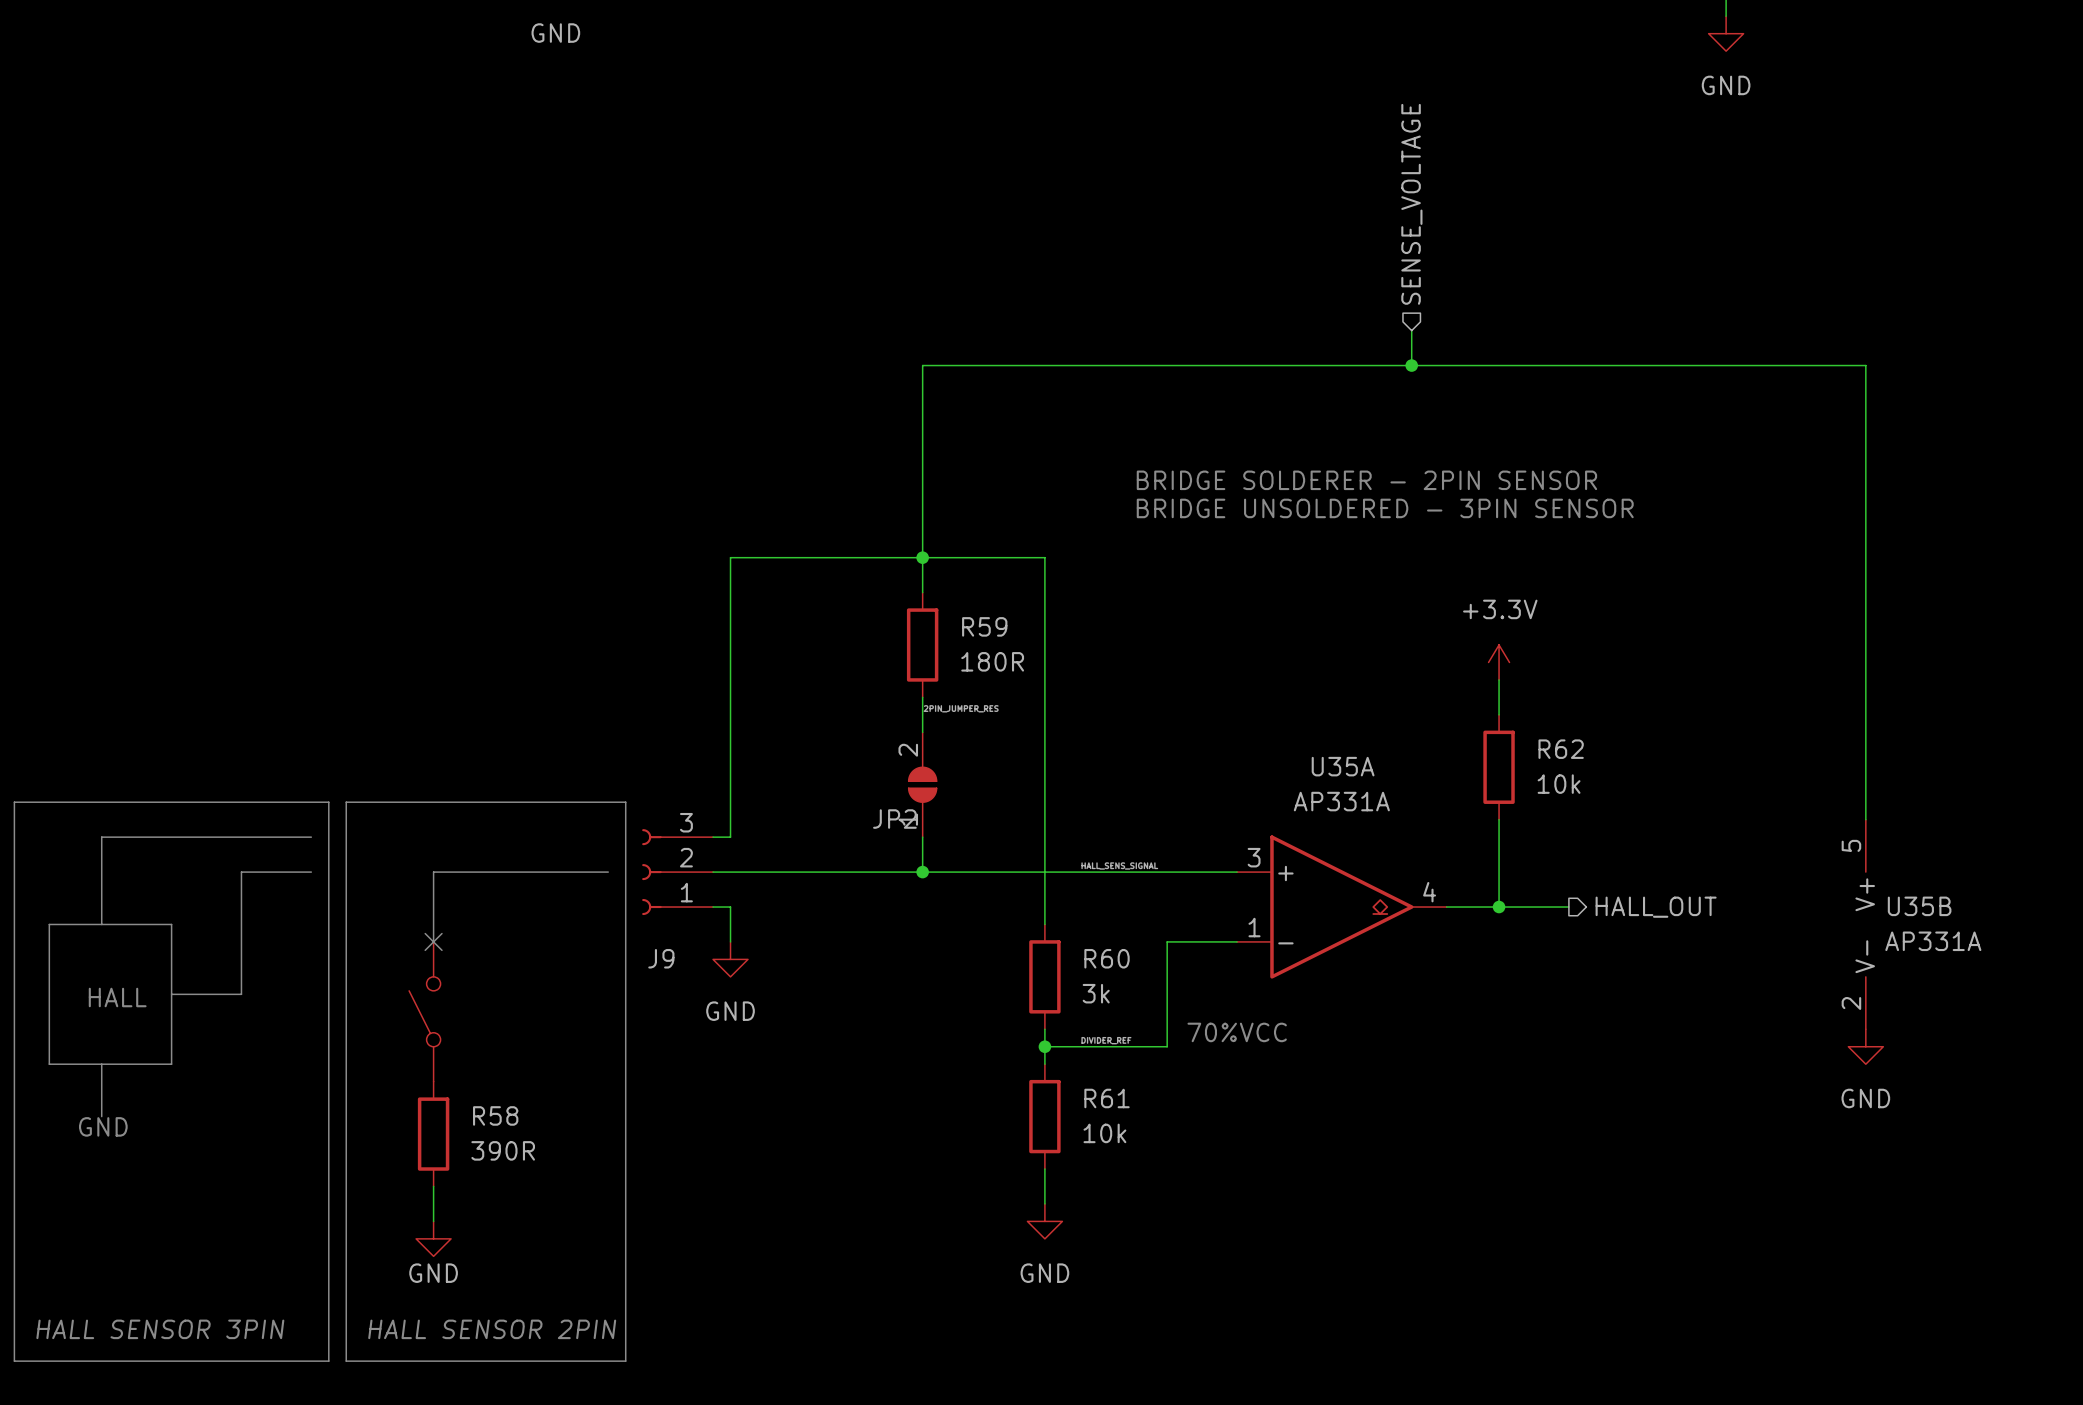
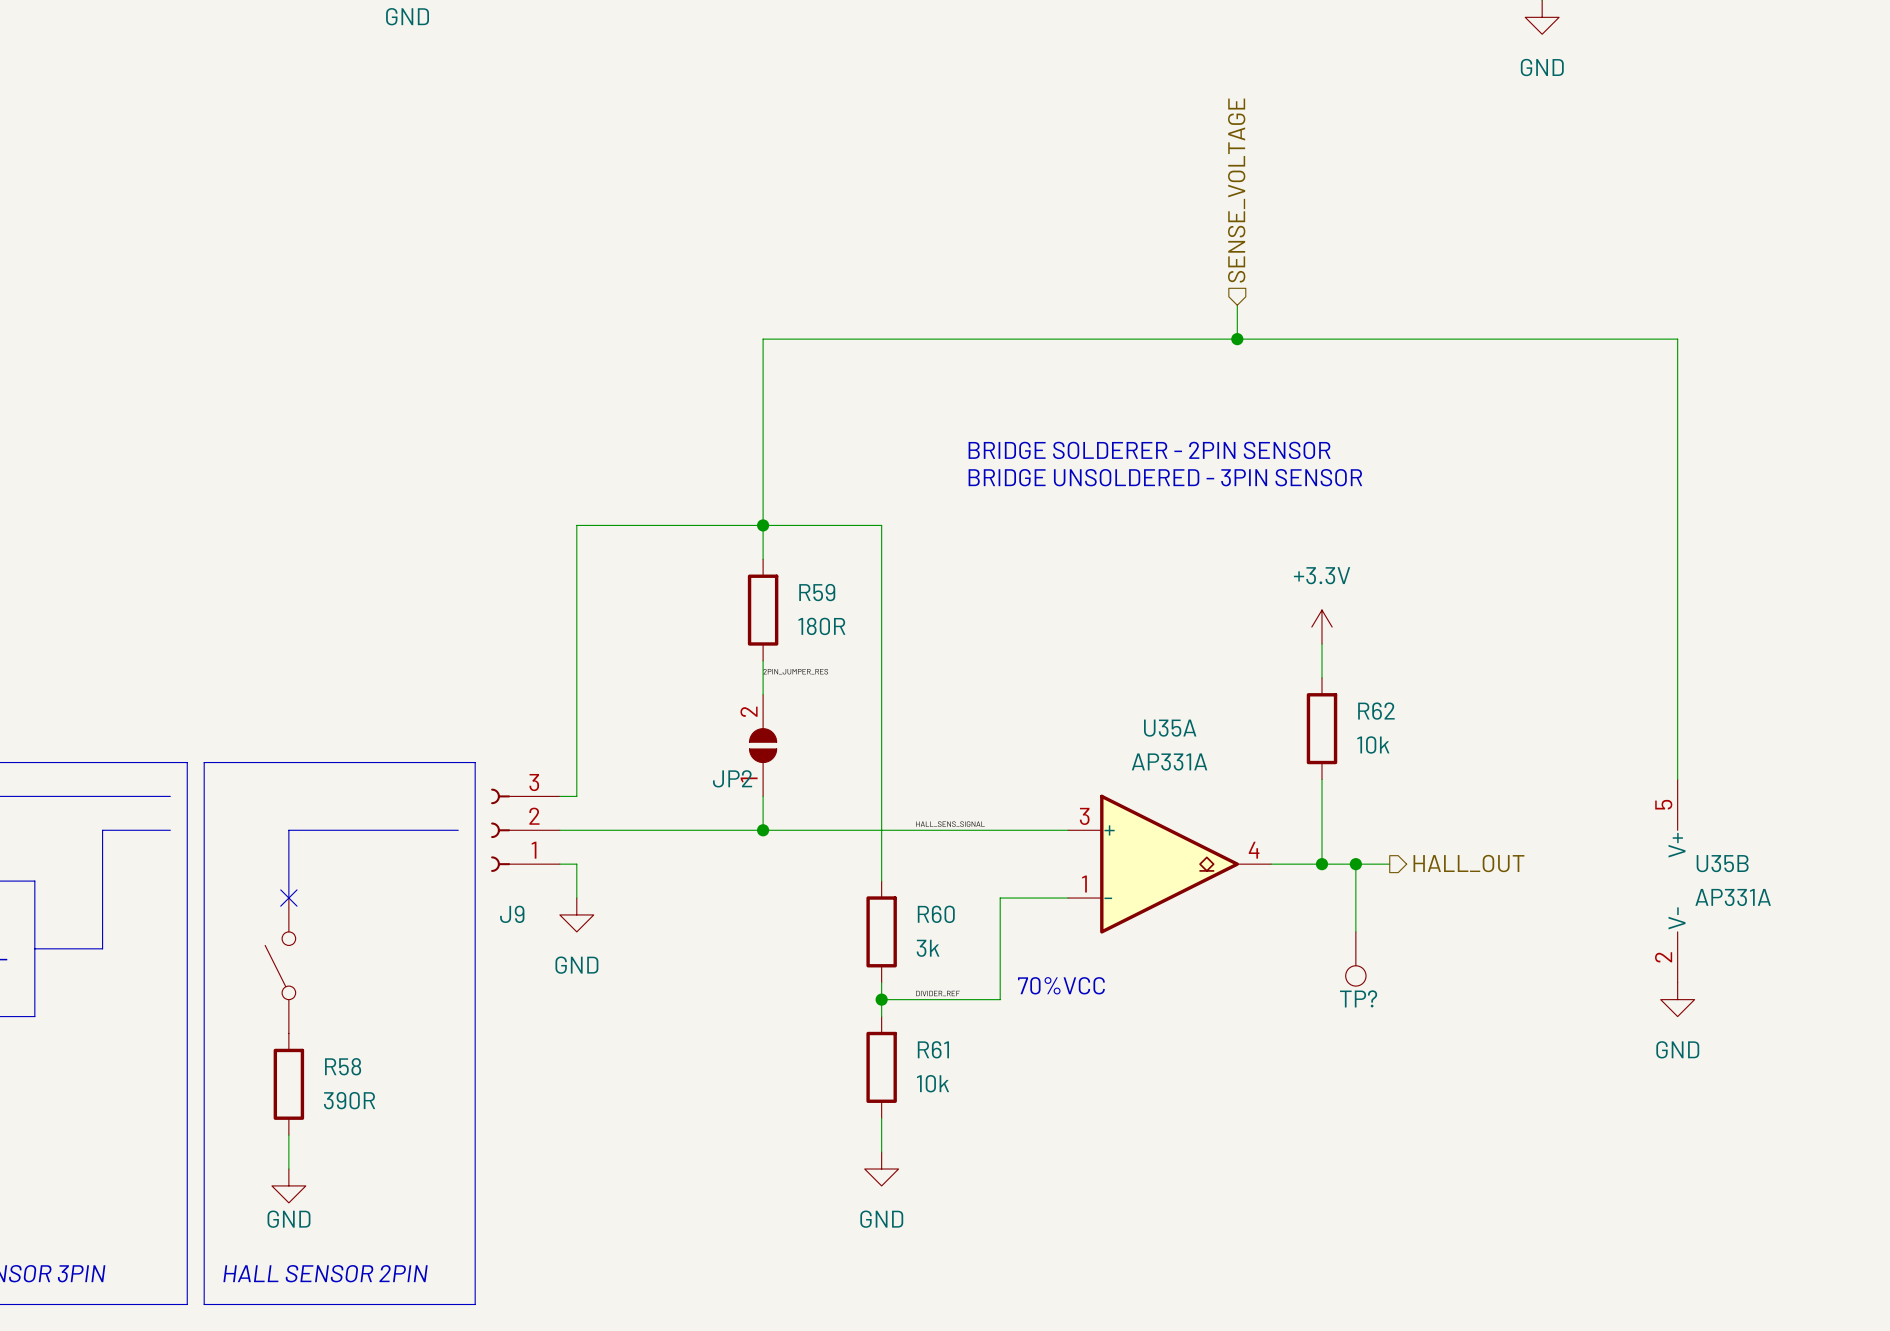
wire: none -> (1355, 864) (1355, 931)
junction: none -> (1355, 864)
TP?: none -> (1355, 958)

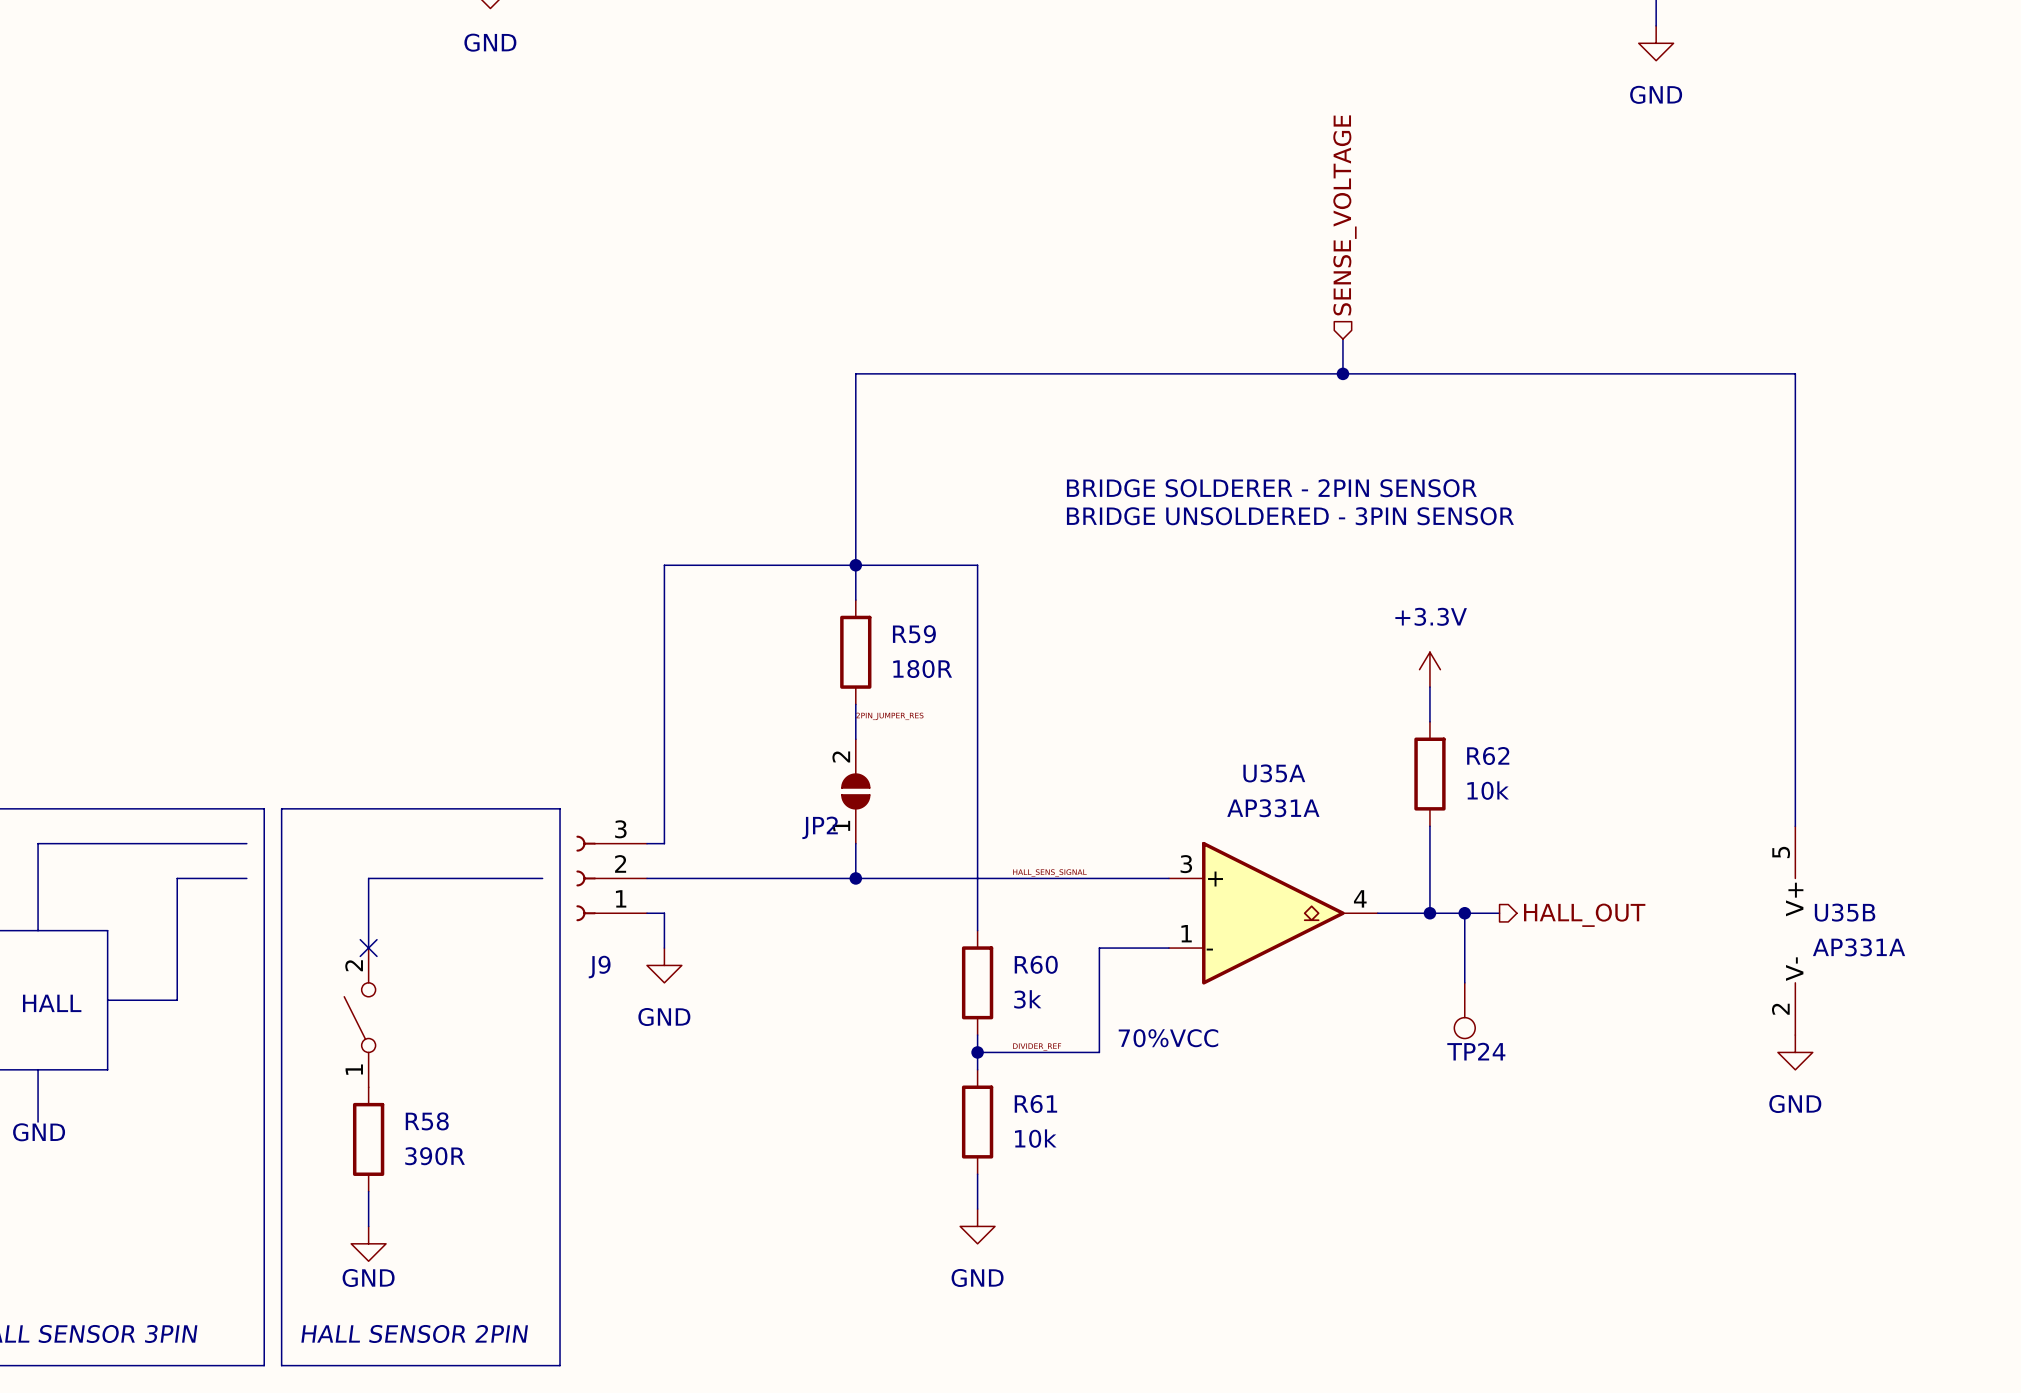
part pin number: none -> 2 (354, 965)
TP? name: TP? (1358, 998) -> TP24 (1476, 1051)
part pin number: none -> 1 (354, 1069)

